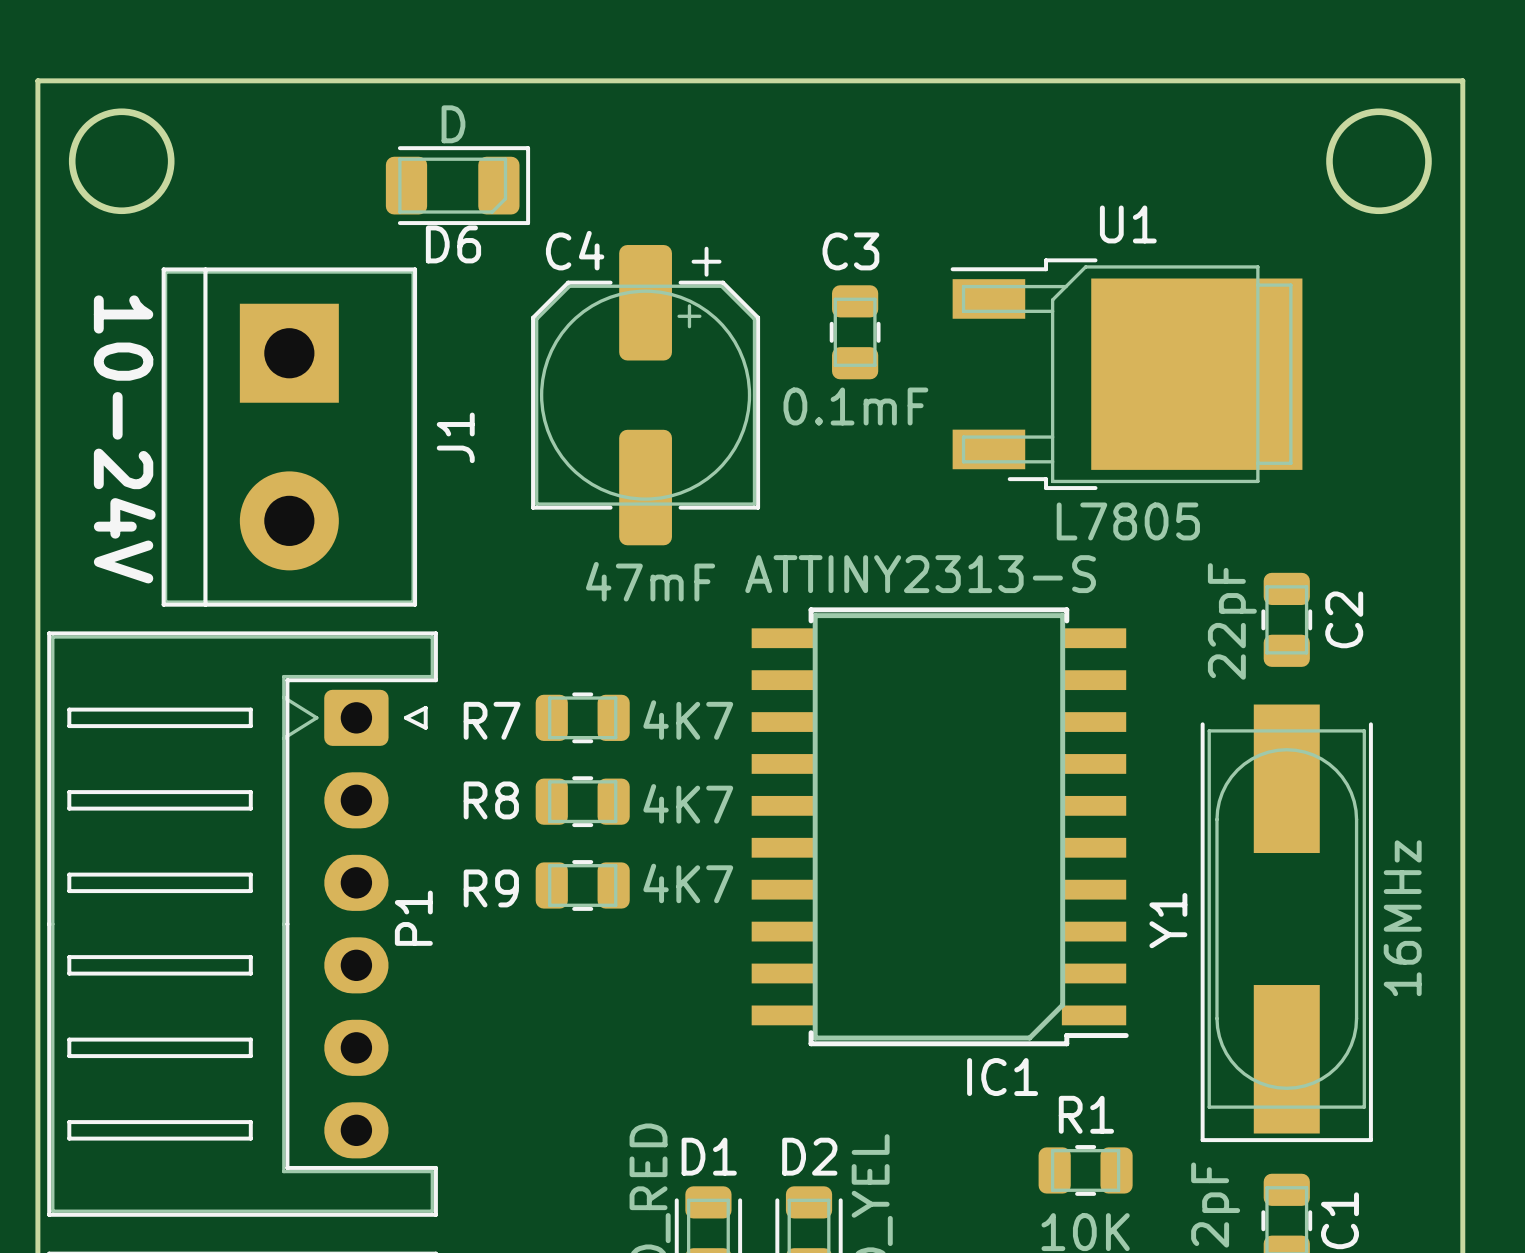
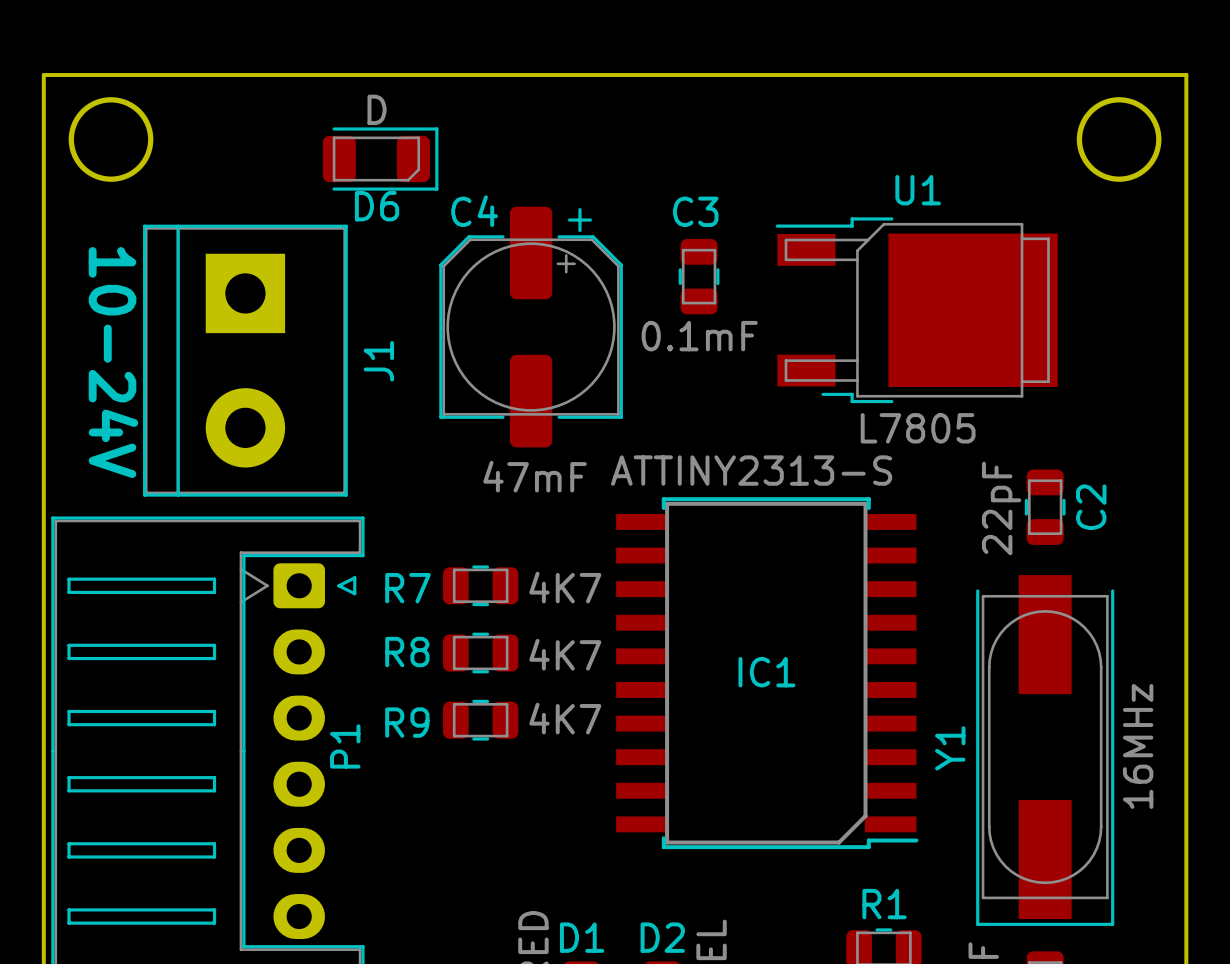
IC1 name position: IC1 (1002, 1077) -> IC1 (766, 672)

